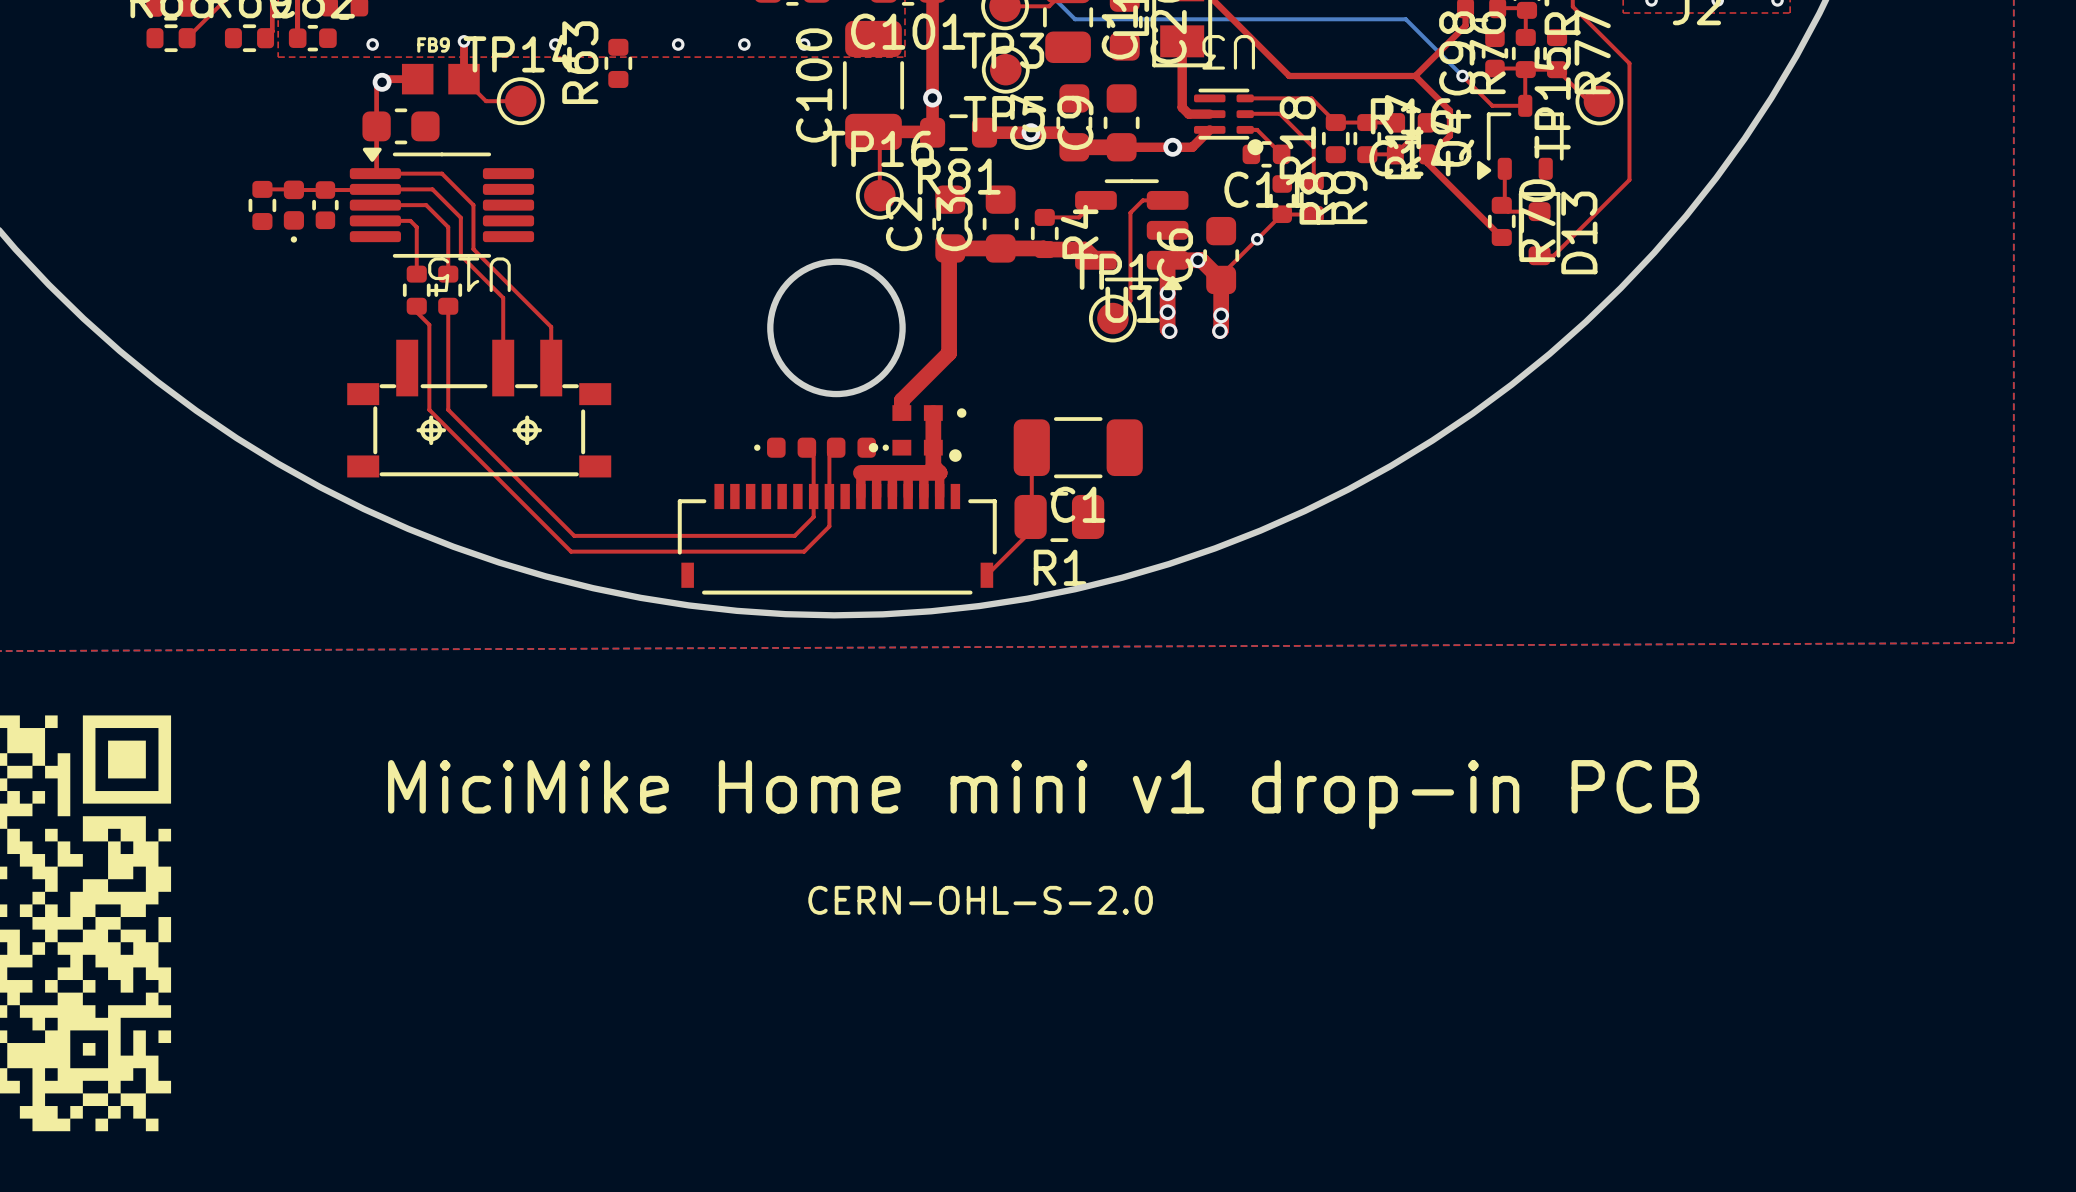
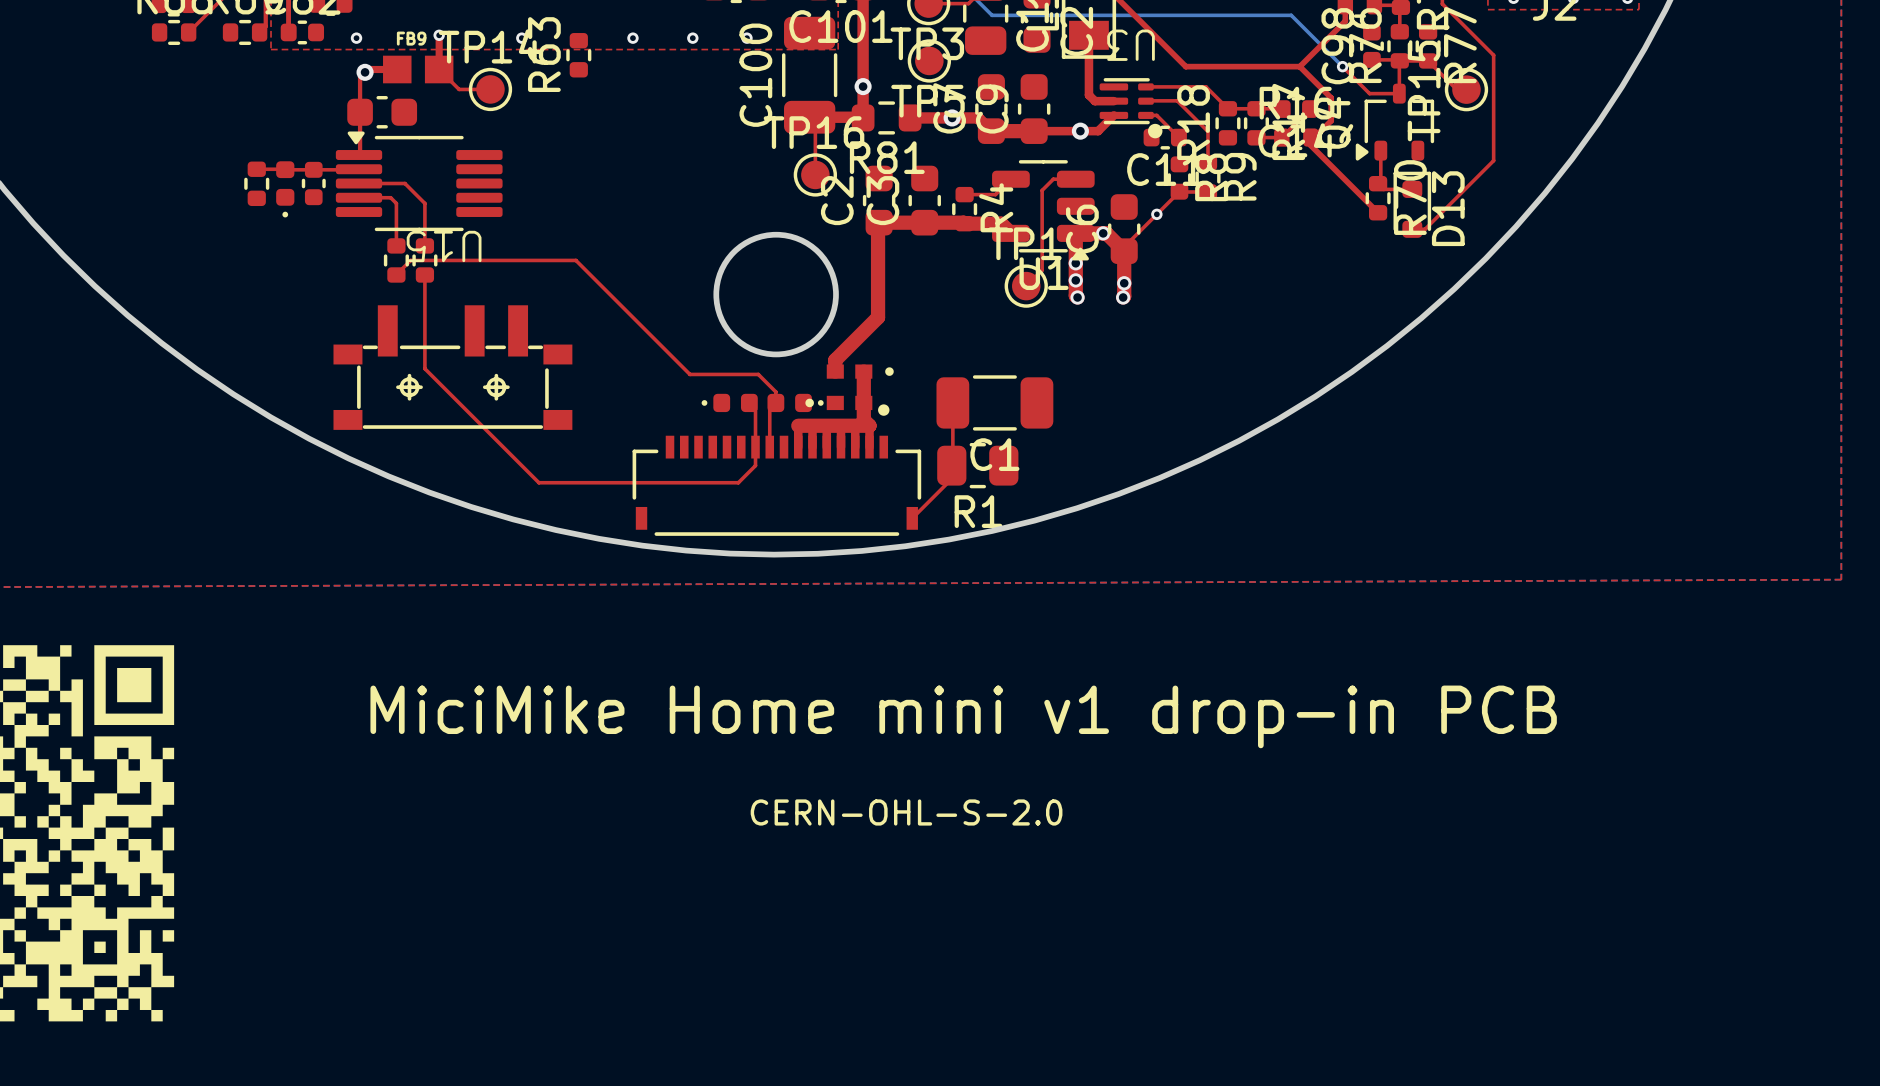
top track: (375, 173) (441, 173) (473, 205) (473, 249) (551, 327) (551, 368) -> none
top track: (375, 189) (432, 189) (460, 217) (460, 255) (503, 297) (503, 368) -> none
top track: (416, 306) (416, 312) (429, 324) (429, 409) (571, 551) (804, 551) (829, 526) (829, 496) -> (396, 274) (410, 260) (575, 260) (689, 374) (758, 374) (775, 391) (775, 402)

